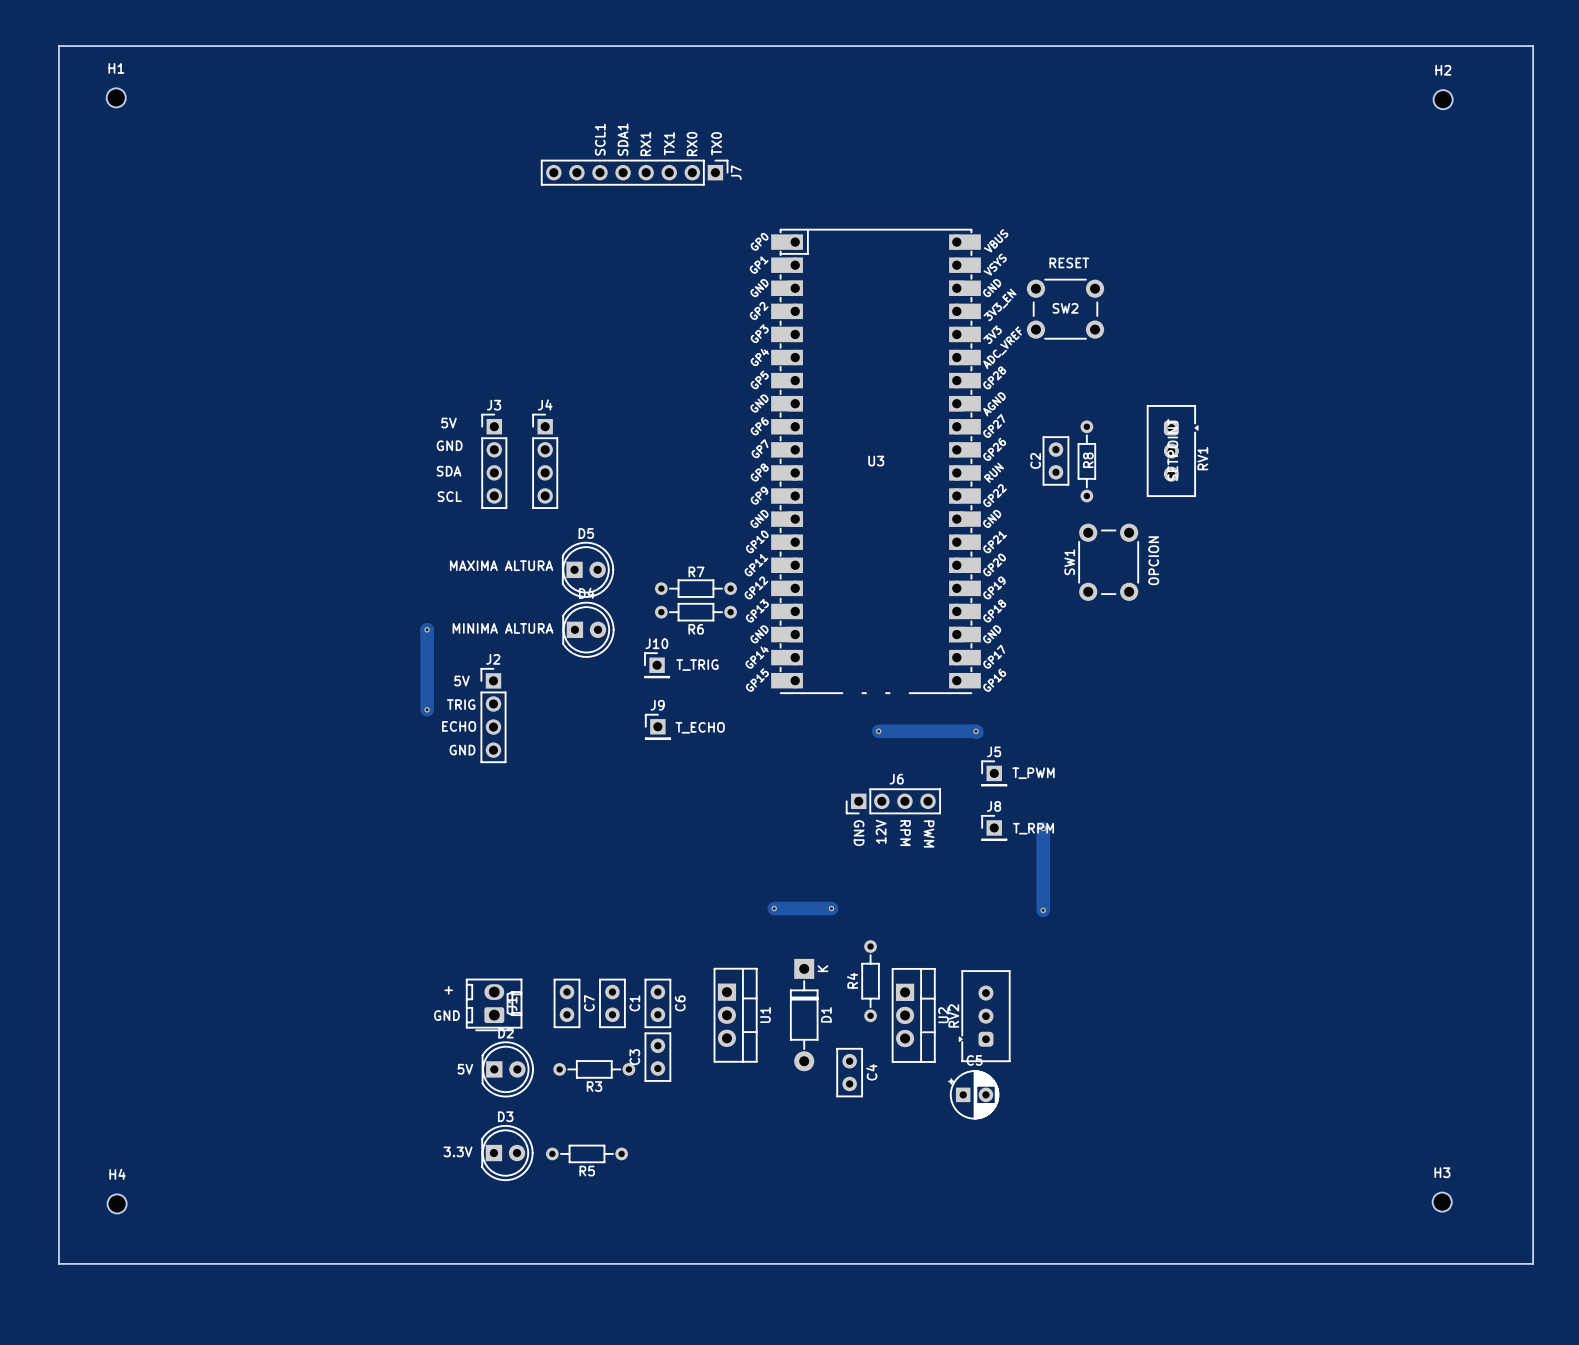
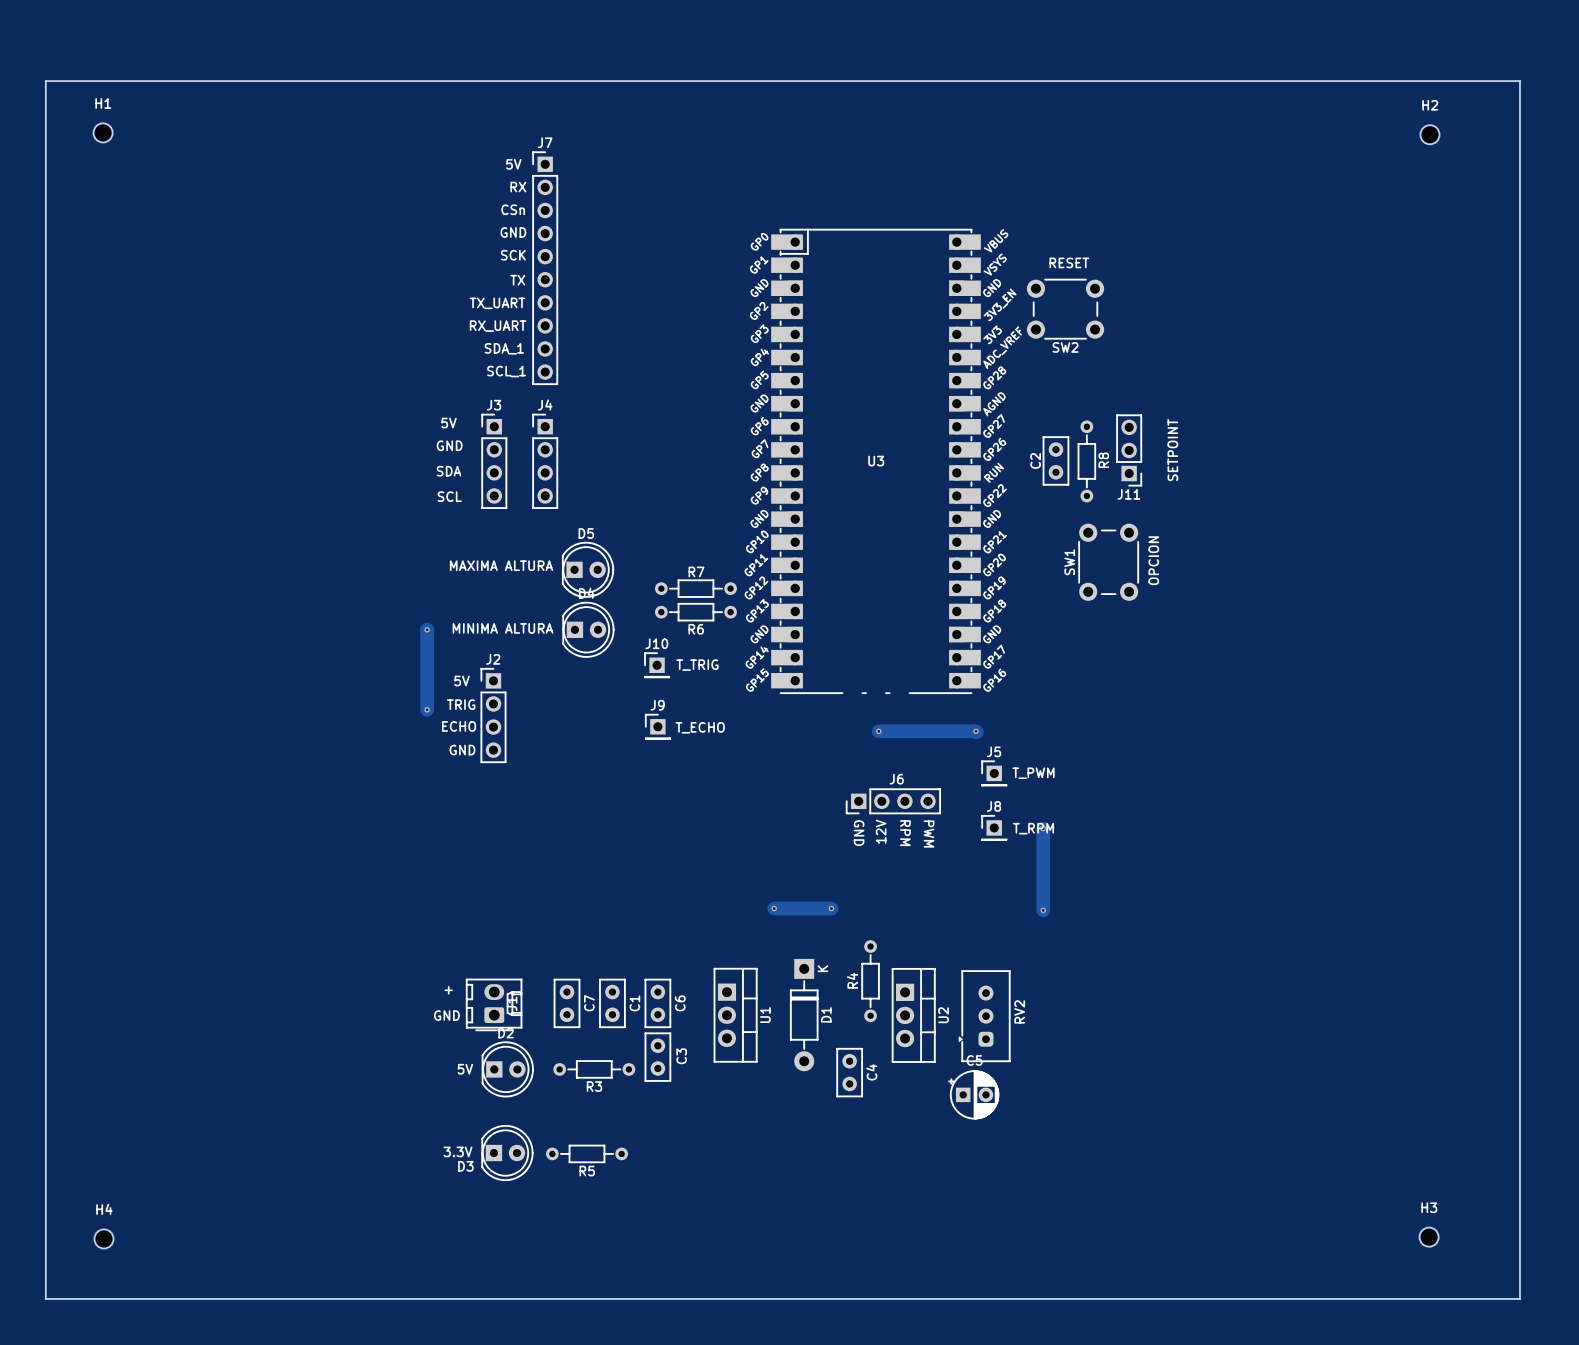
board edge: (58, 46) (1533, 46) (1533, 1263) (58, 1263) (58, 46) -> (45, 81) (1519, 81) (1519, 1298) (45, 1298) (45, 81)
H1 position: (116, 97) -> (103, 132)
H2 position: (1443, 99) -> (1429, 134)
text: SCL1 (600, 139) -> none
text: SDA1 (623, 139) -> none
text: TX1 (669, 143) -> none
text: TX0 (716, 143) -> none
text: RX1 (645, 144) -> none
text: RX0 (692, 144) -> none
J7 footprint: [541, 160, 729, 186] -> [532, 151, 558, 385]
text: none -> 5V (513, 164)
J7 name position: J7 (736, 172) -> J7 (545, 142)
text: none -> RX (518, 187)
text: none -> CSn (513, 209)
text: none -> GND (513, 232)
text: none -> SCK (513, 255)
text: none -> TX (517, 280)
text: none -> TX_UART (497, 303)
SW2 name position: SW2 (1065, 308) -> SW2 (1065, 347)
text: none -> RX_UART (498, 326)
text: none -> SDA_1 (504, 348)
text: none -> SCL_1 (506, 371)
J11: none -> (1129, 450)
RV1: (1172, 451) -> none
R8 name position: R8 (1088, 460) -> R8 (1103, 460)
RV2 name position: RV2 (953, 1015) -> RV2 (1019, 1011)
C3 name position: C3 (634, 1057) -> C3 (681, 1056)
D3 name position: D3 (505, 1116) -> D3 (465, 1166)
H3 position: (1442, 1202) -> (1429, 1237)
H4 position: (117, 1203) -> (104, 1238)

